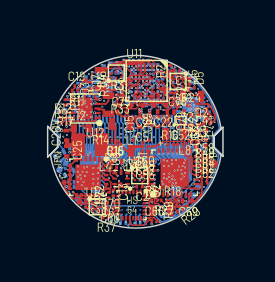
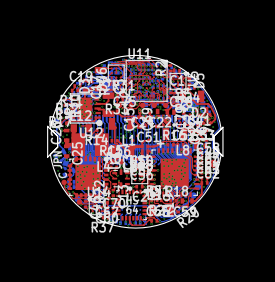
part: (59, 169) -> none

